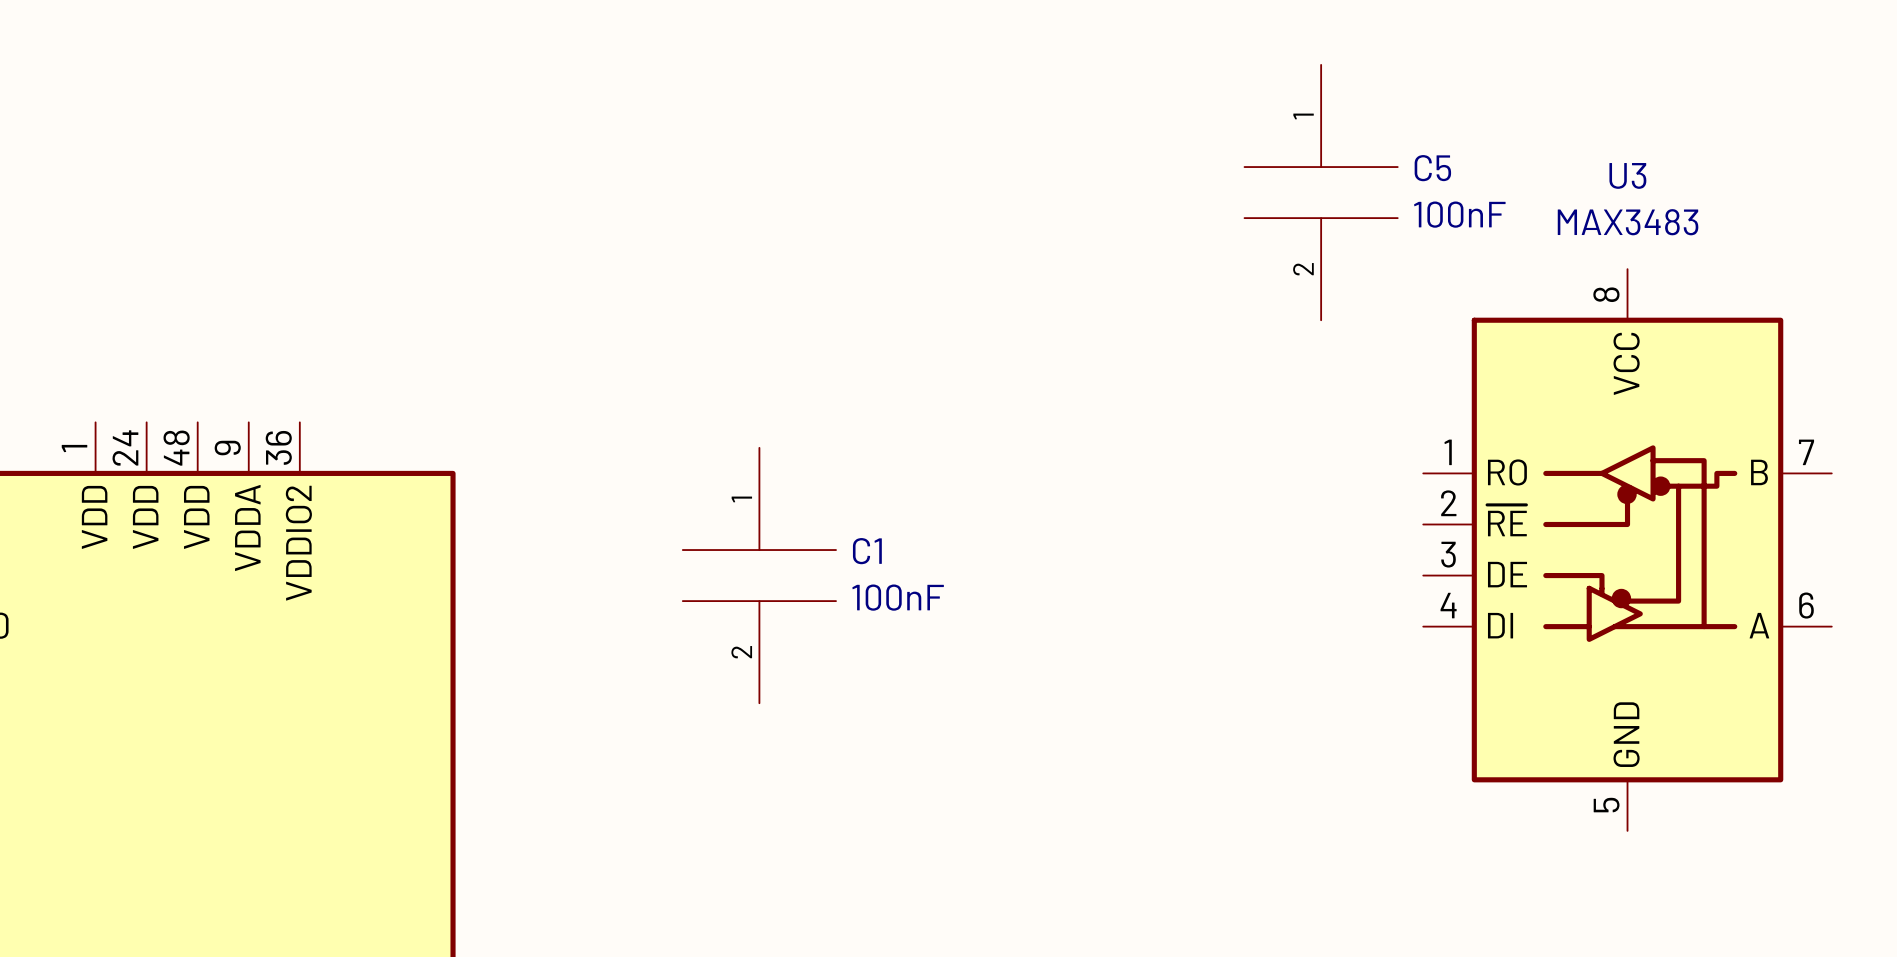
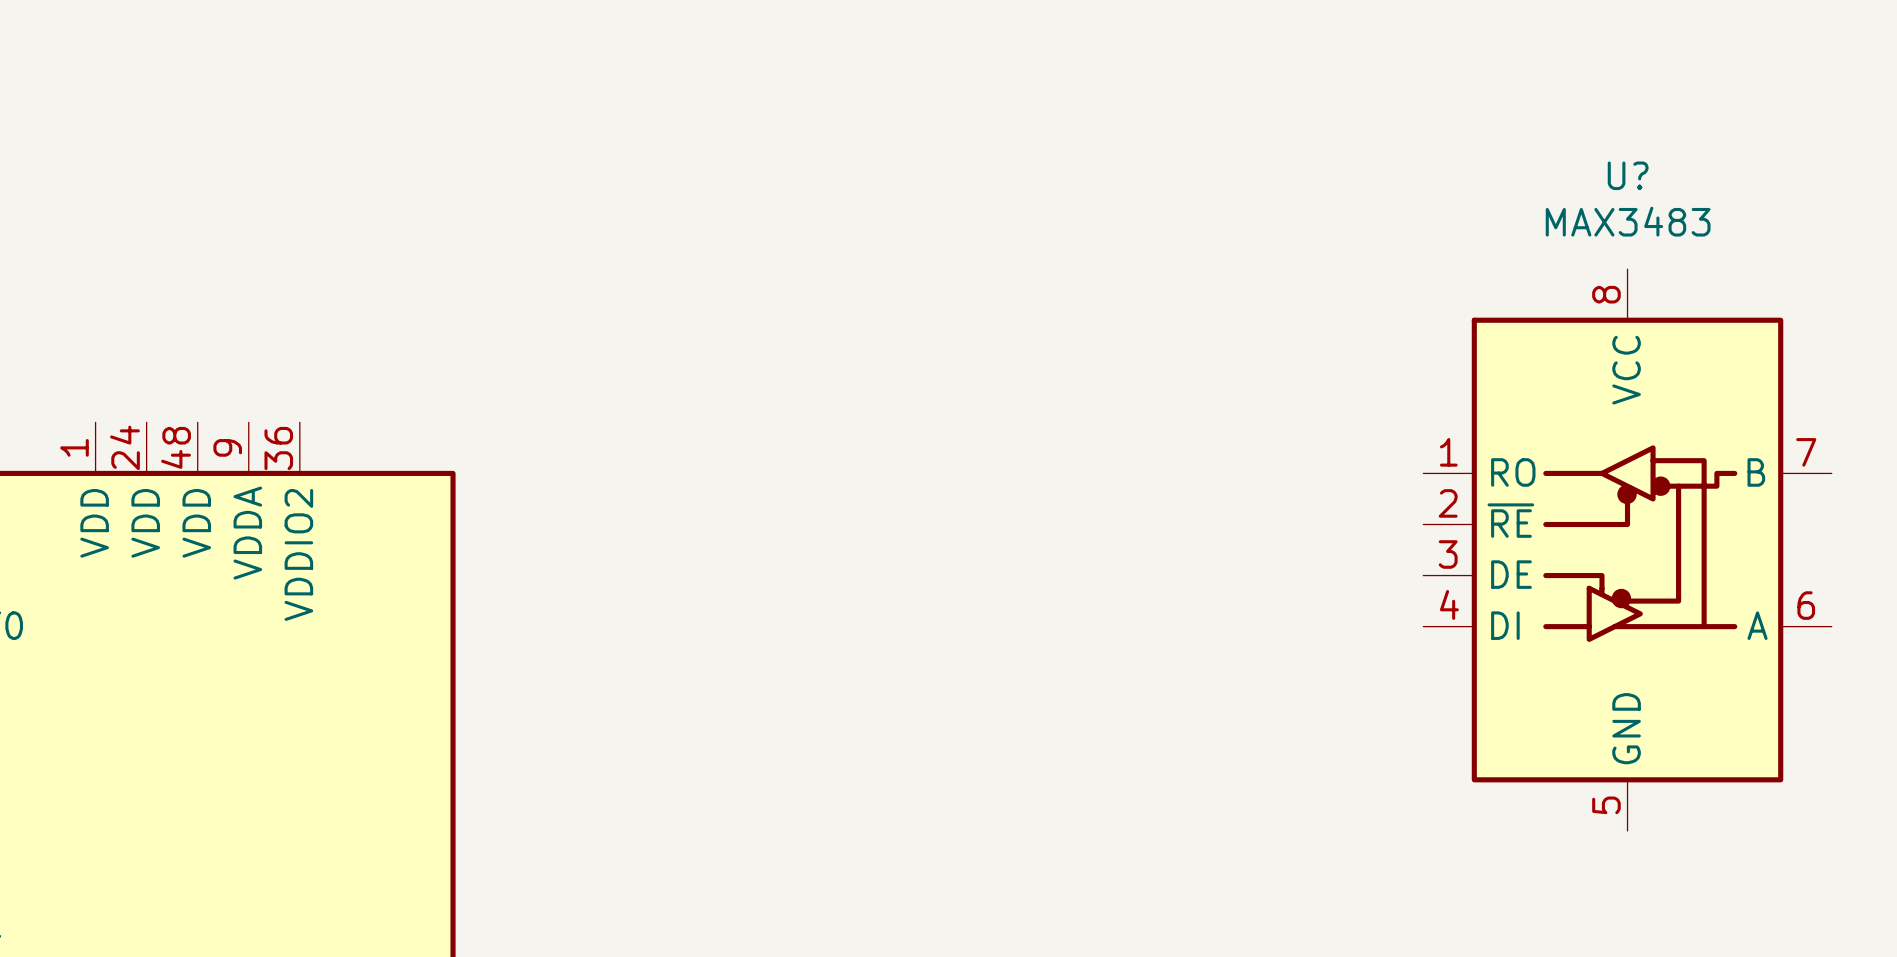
U3 name: U3 (1627, 175) -> U? (1628, 175)
C5: 100nF (1321, 192) -> none
C1: 100nF (759, 575) -> none

